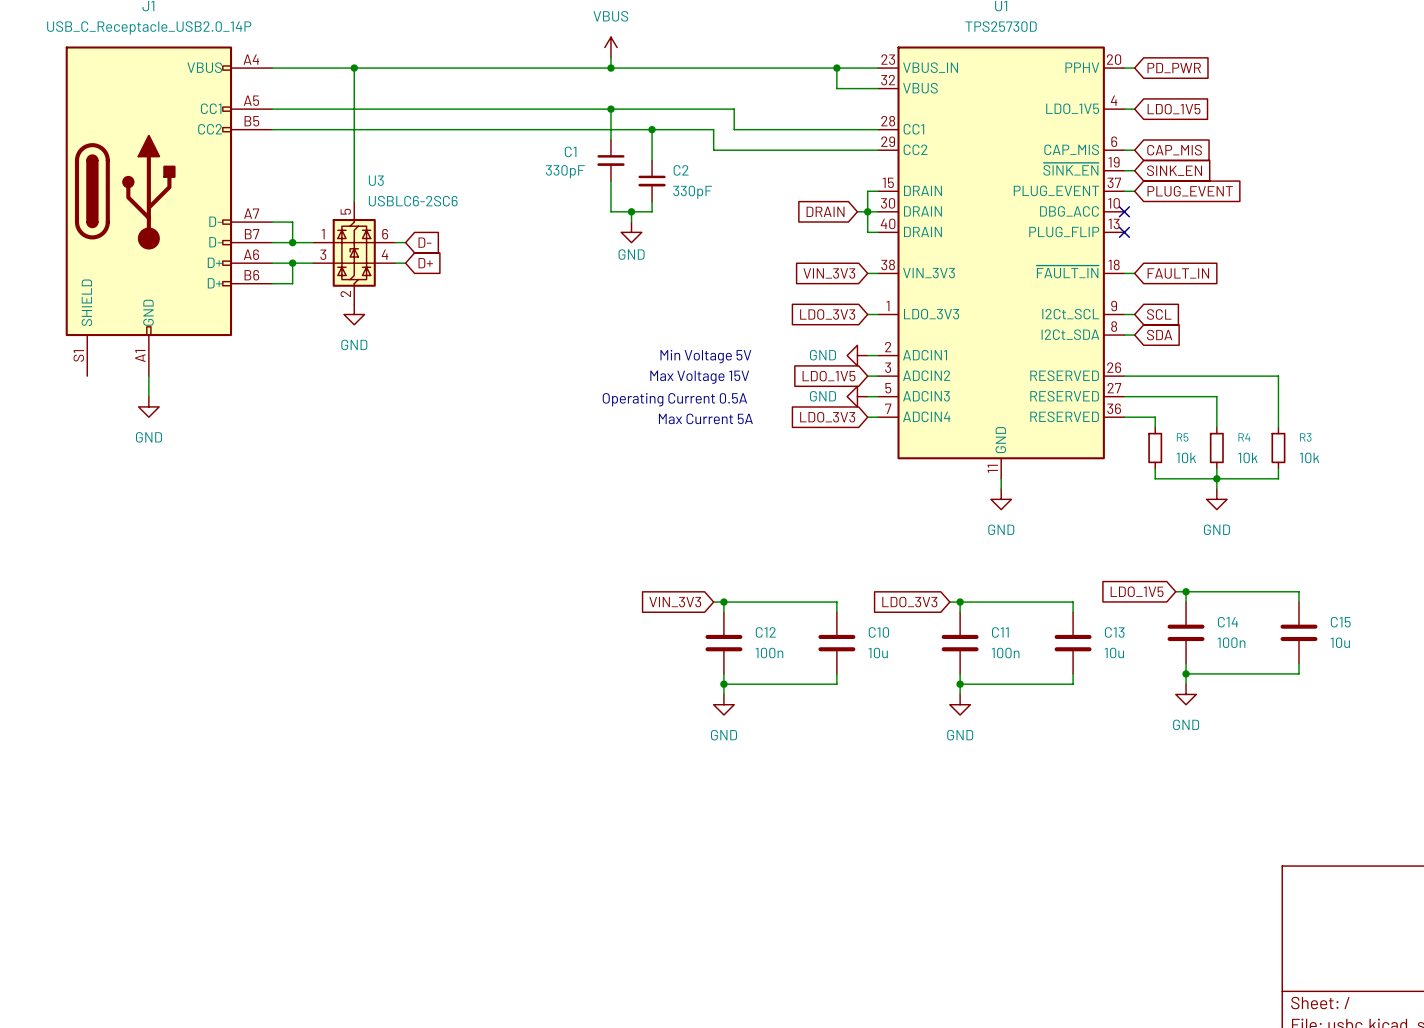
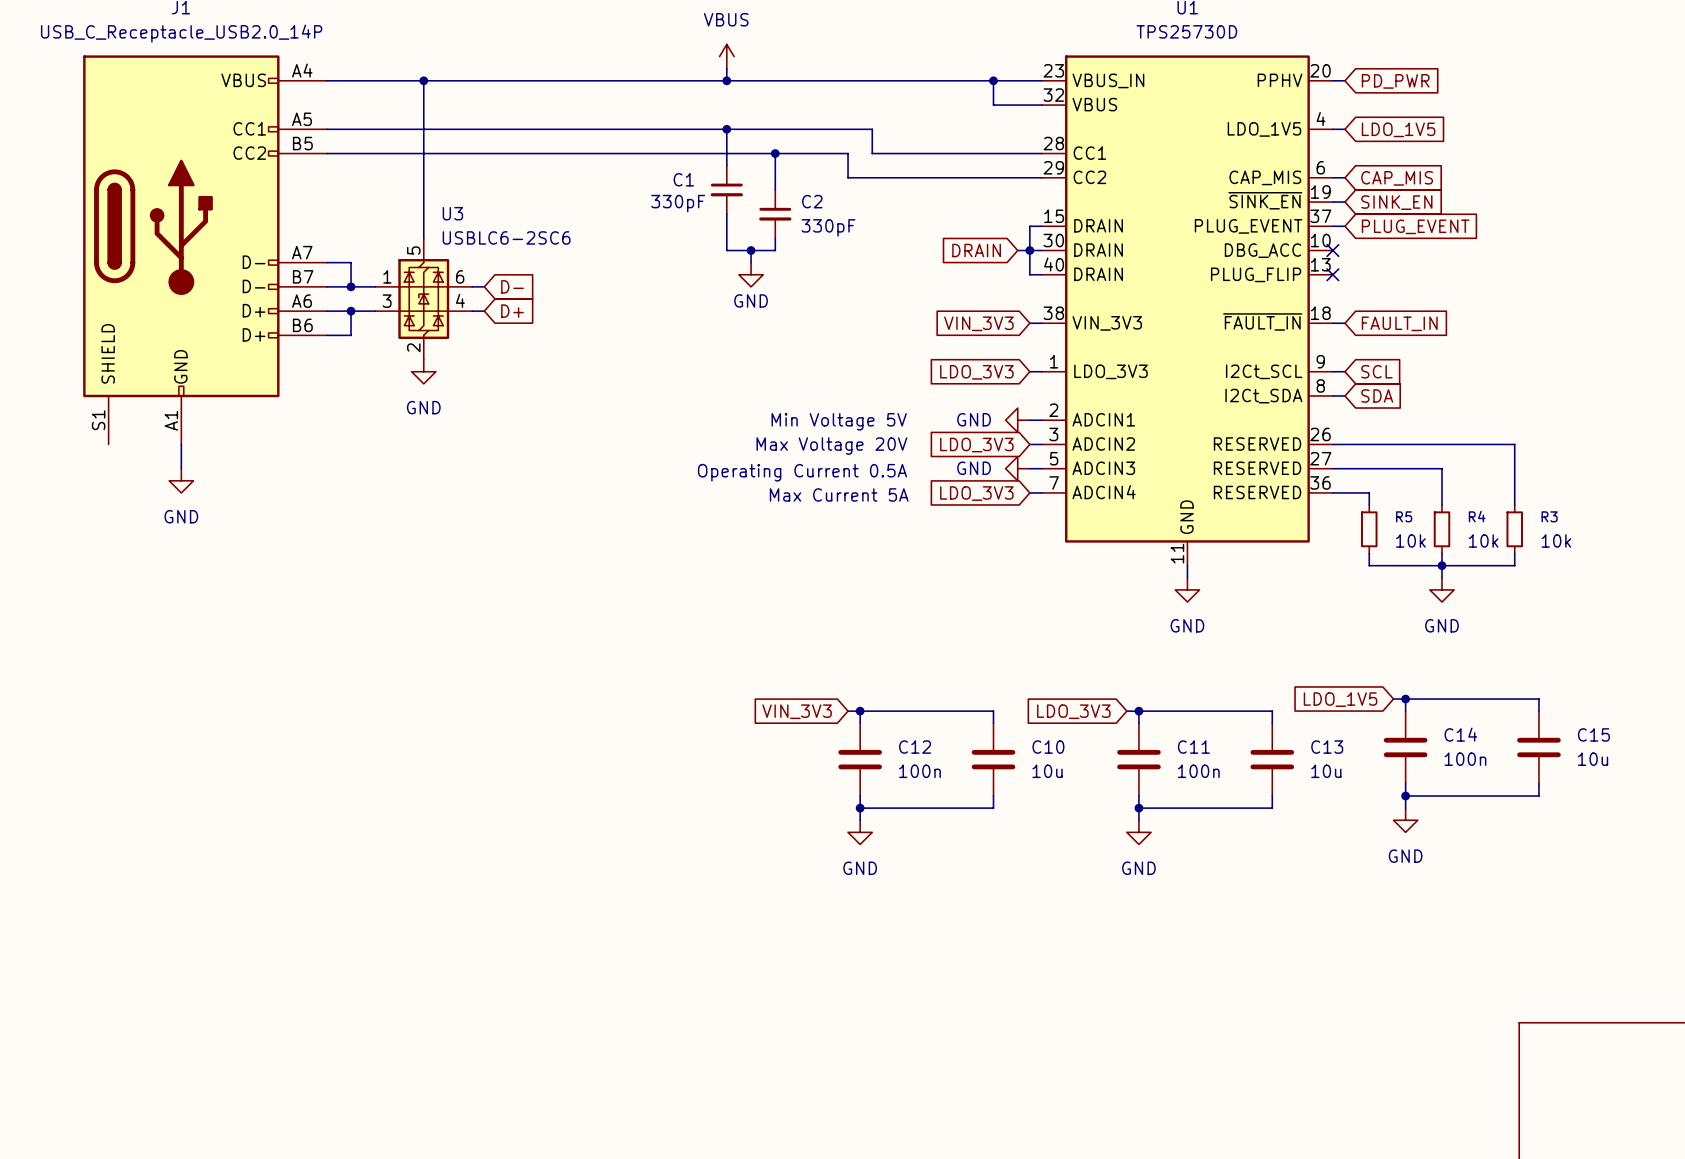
global label: LDO_1V5 (829, 376) -> LDO_3V3 (976, 445)
text: Max Voltage 15V (699, 377) -> Max Voltage 20V (831, 446)

